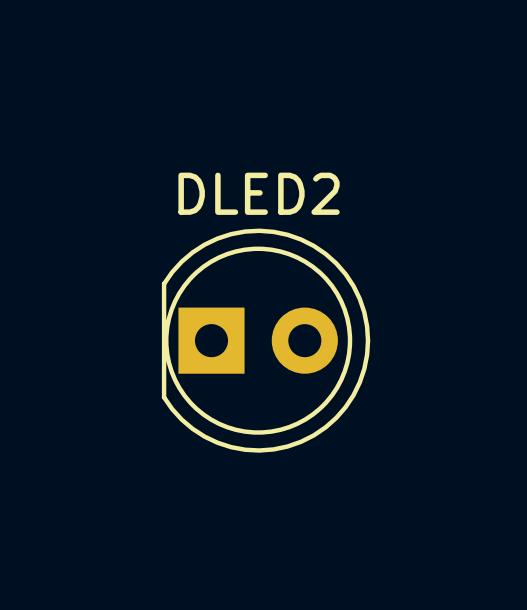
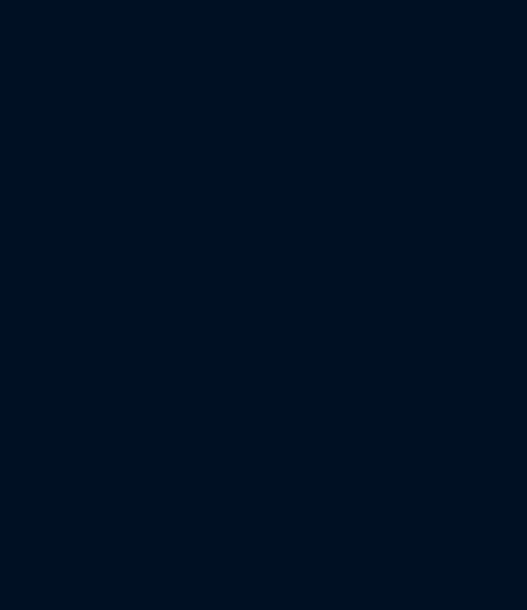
DLED2: (266, 340) -> none

